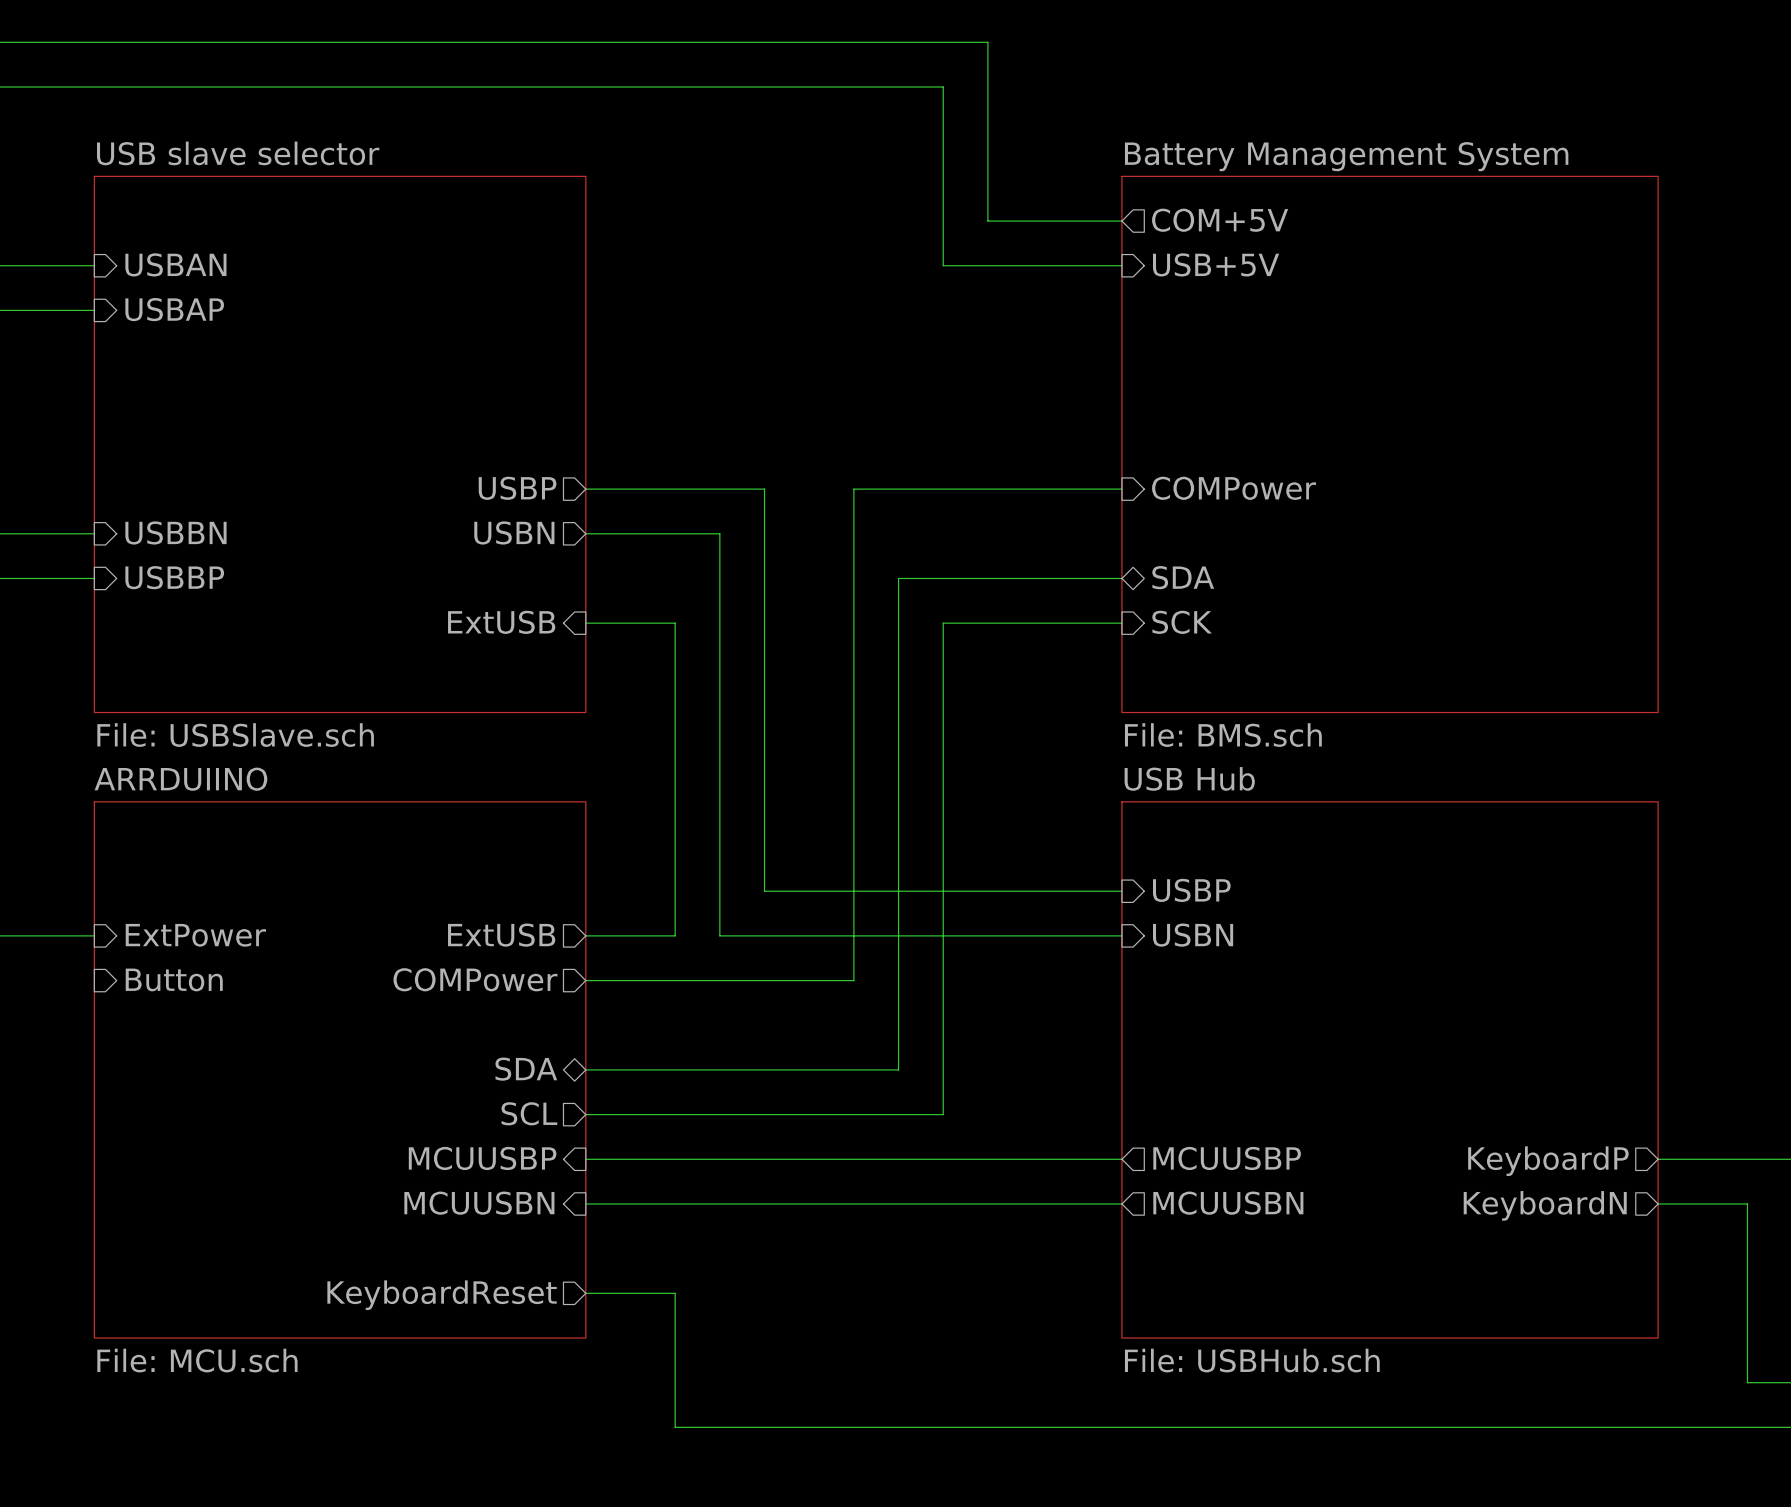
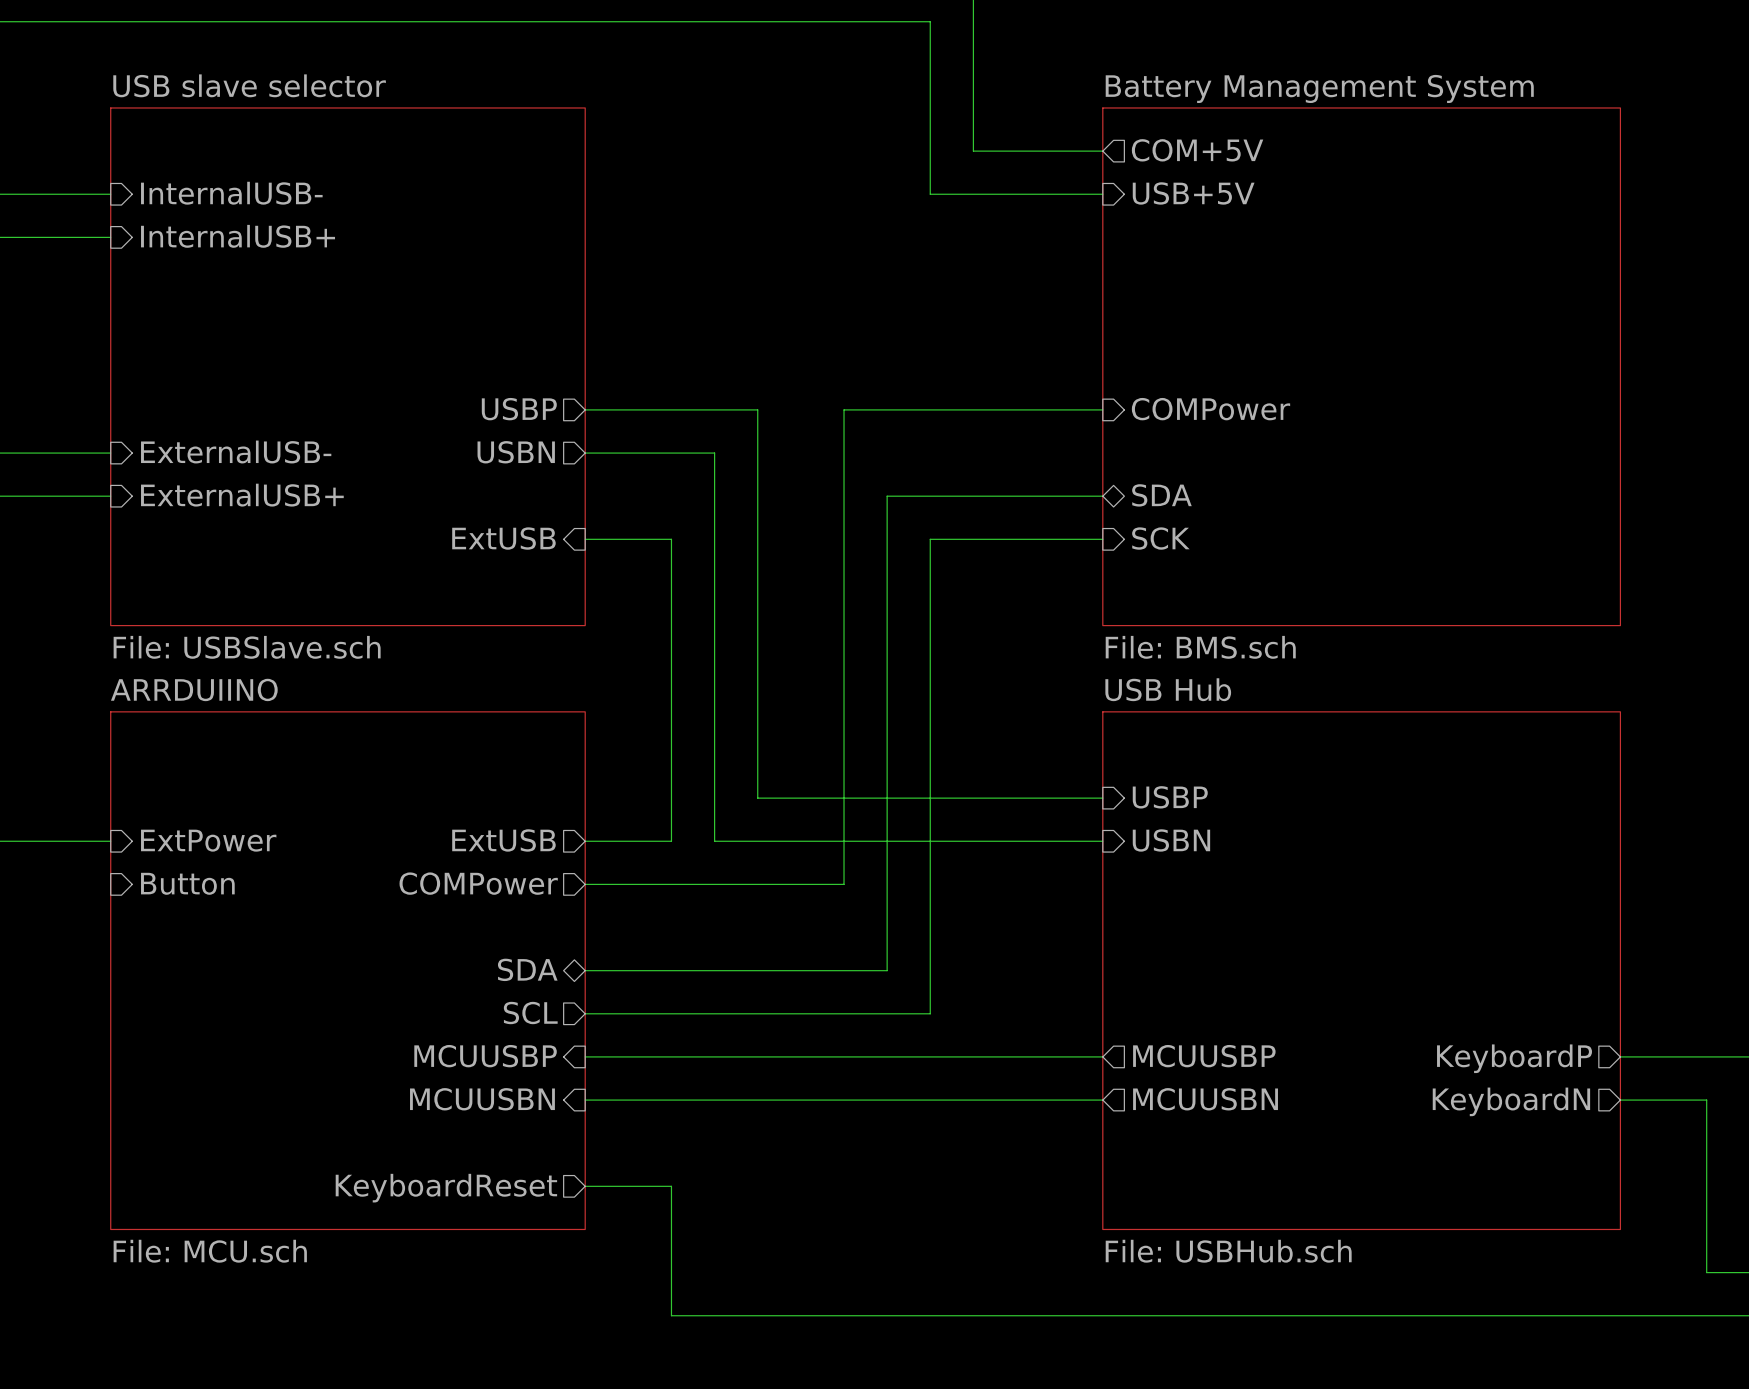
sheet pin: USBAN (175, 264) -> InternalUSB- (231, 193)
sheet pin: USBAP (174, 309) -> InternalUSB+ (238, 236)
sheet pin: USBBN (175, 532) -> ExternalUSB- (236, 452)
sheet pin: USBBP (174, 577) -> ExternalUSB+ (242, 495)

